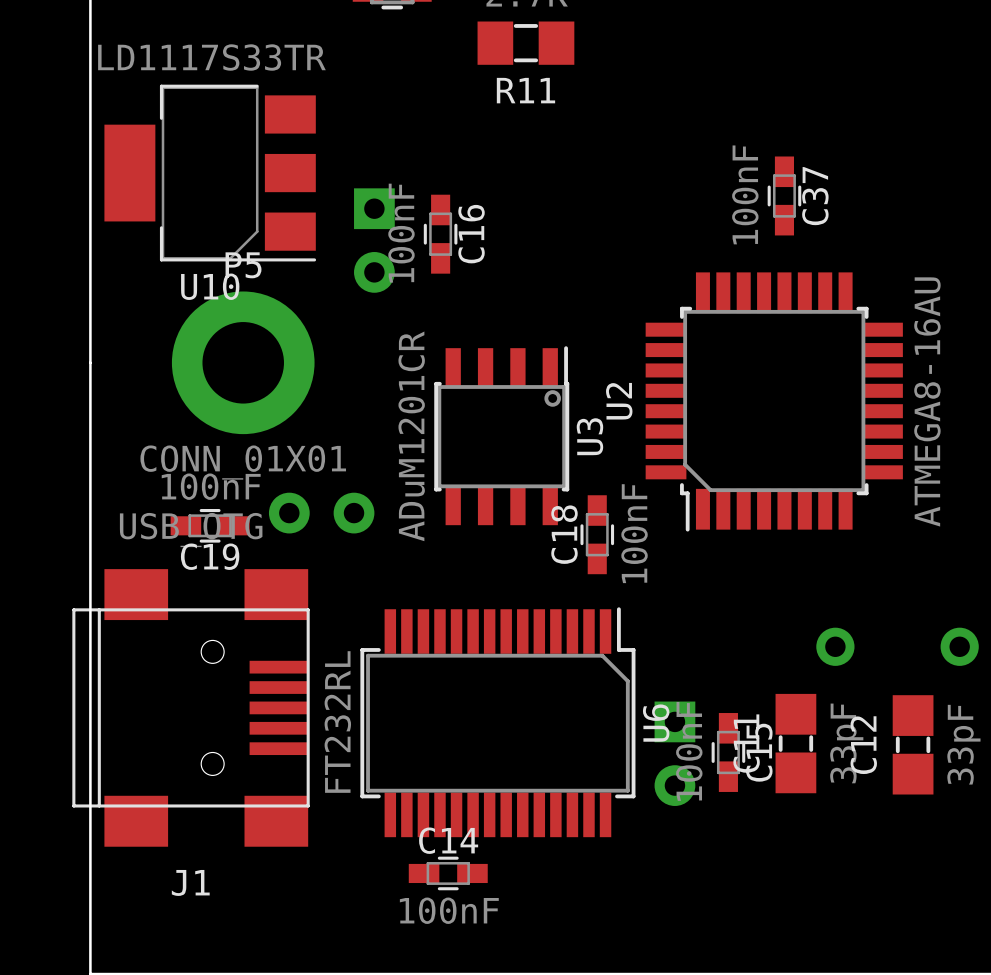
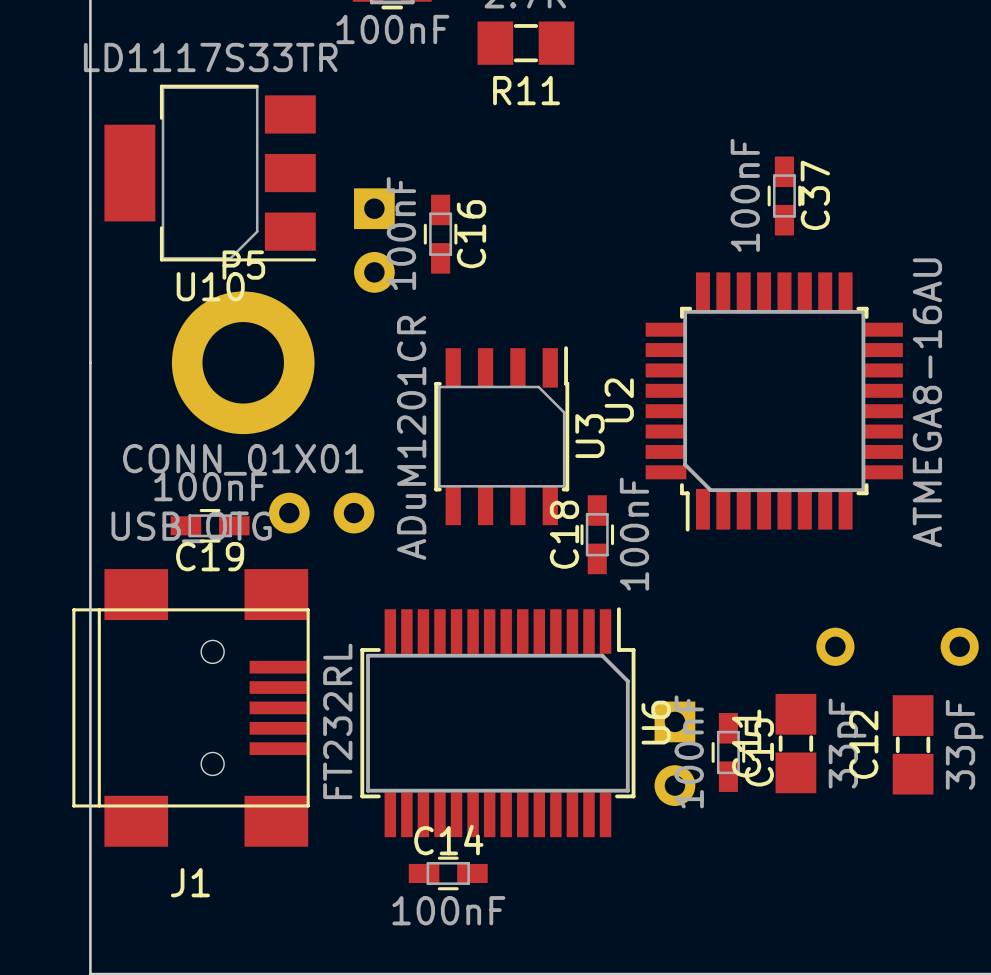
part value: none -> 100nF (392, 29)
U3 footprint: [434, 346, 570, 526] -> [434, 346, 570, 526]

